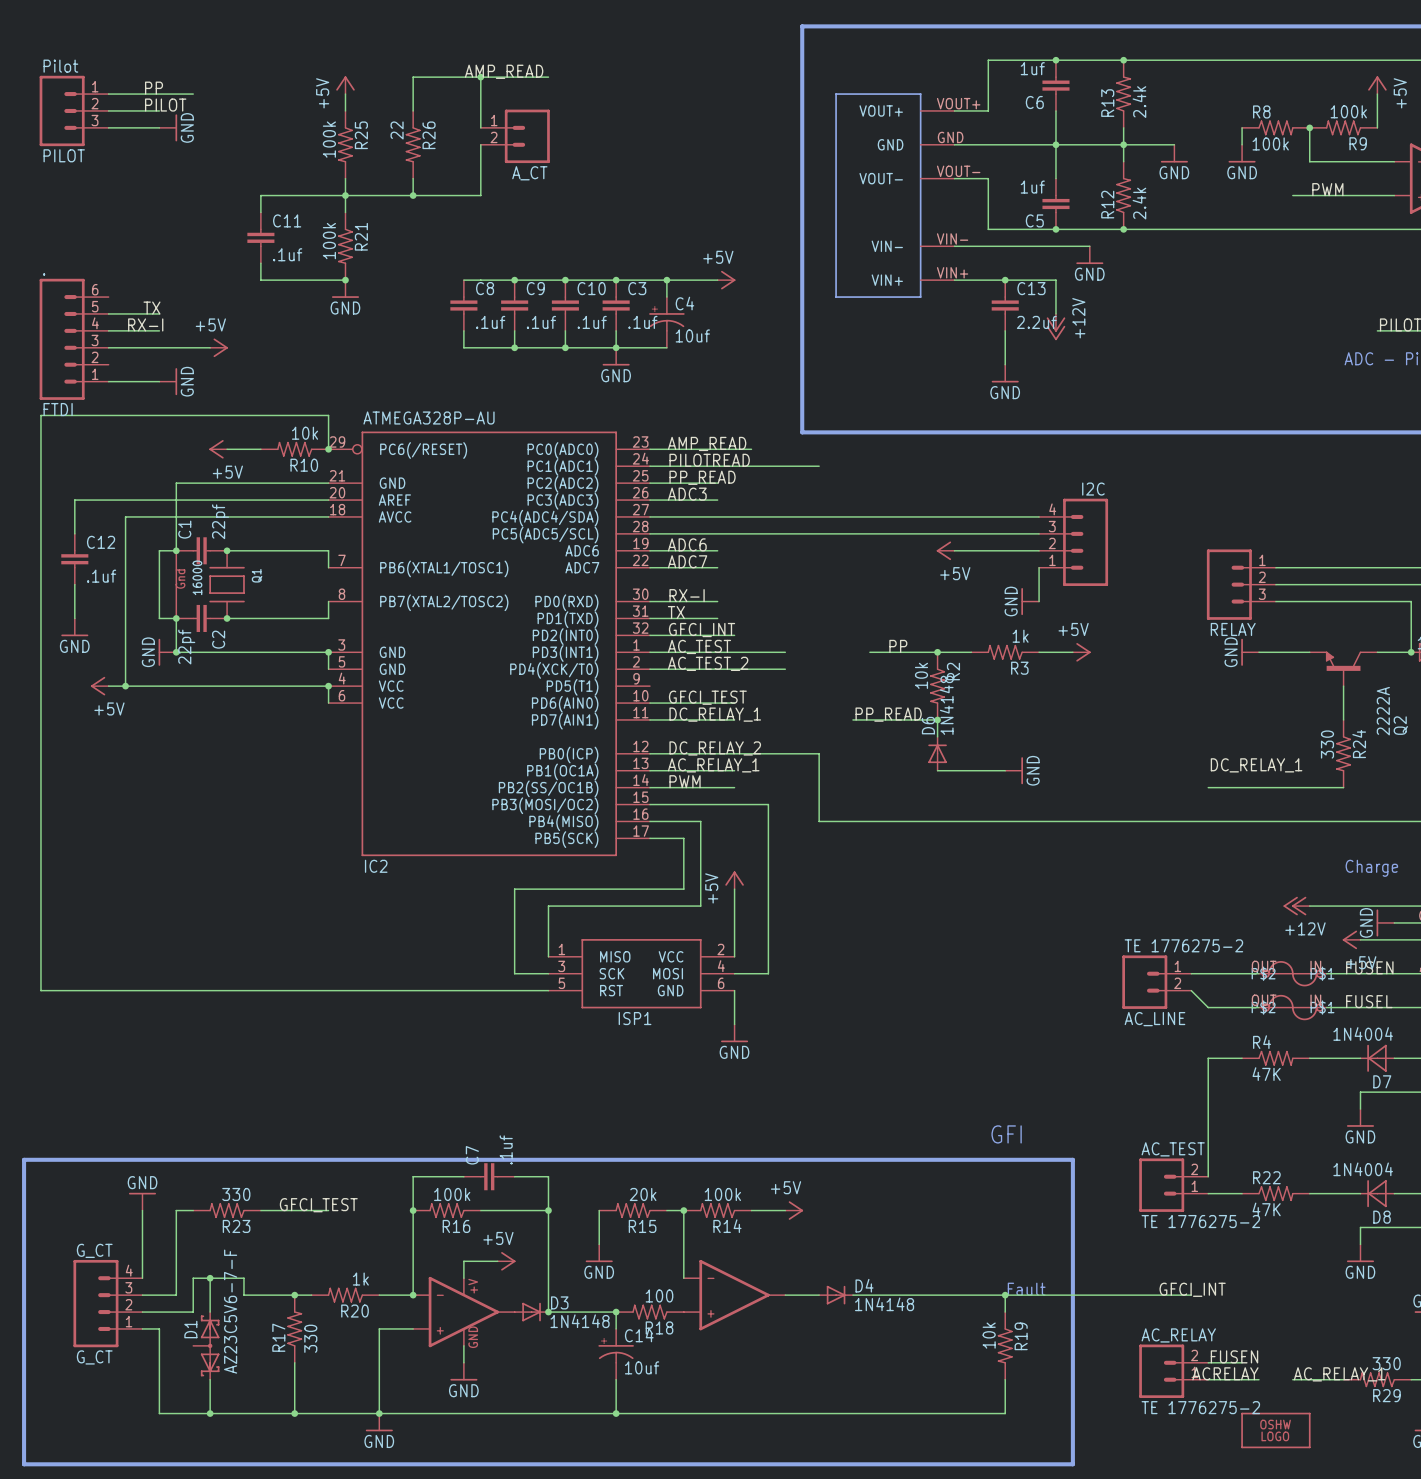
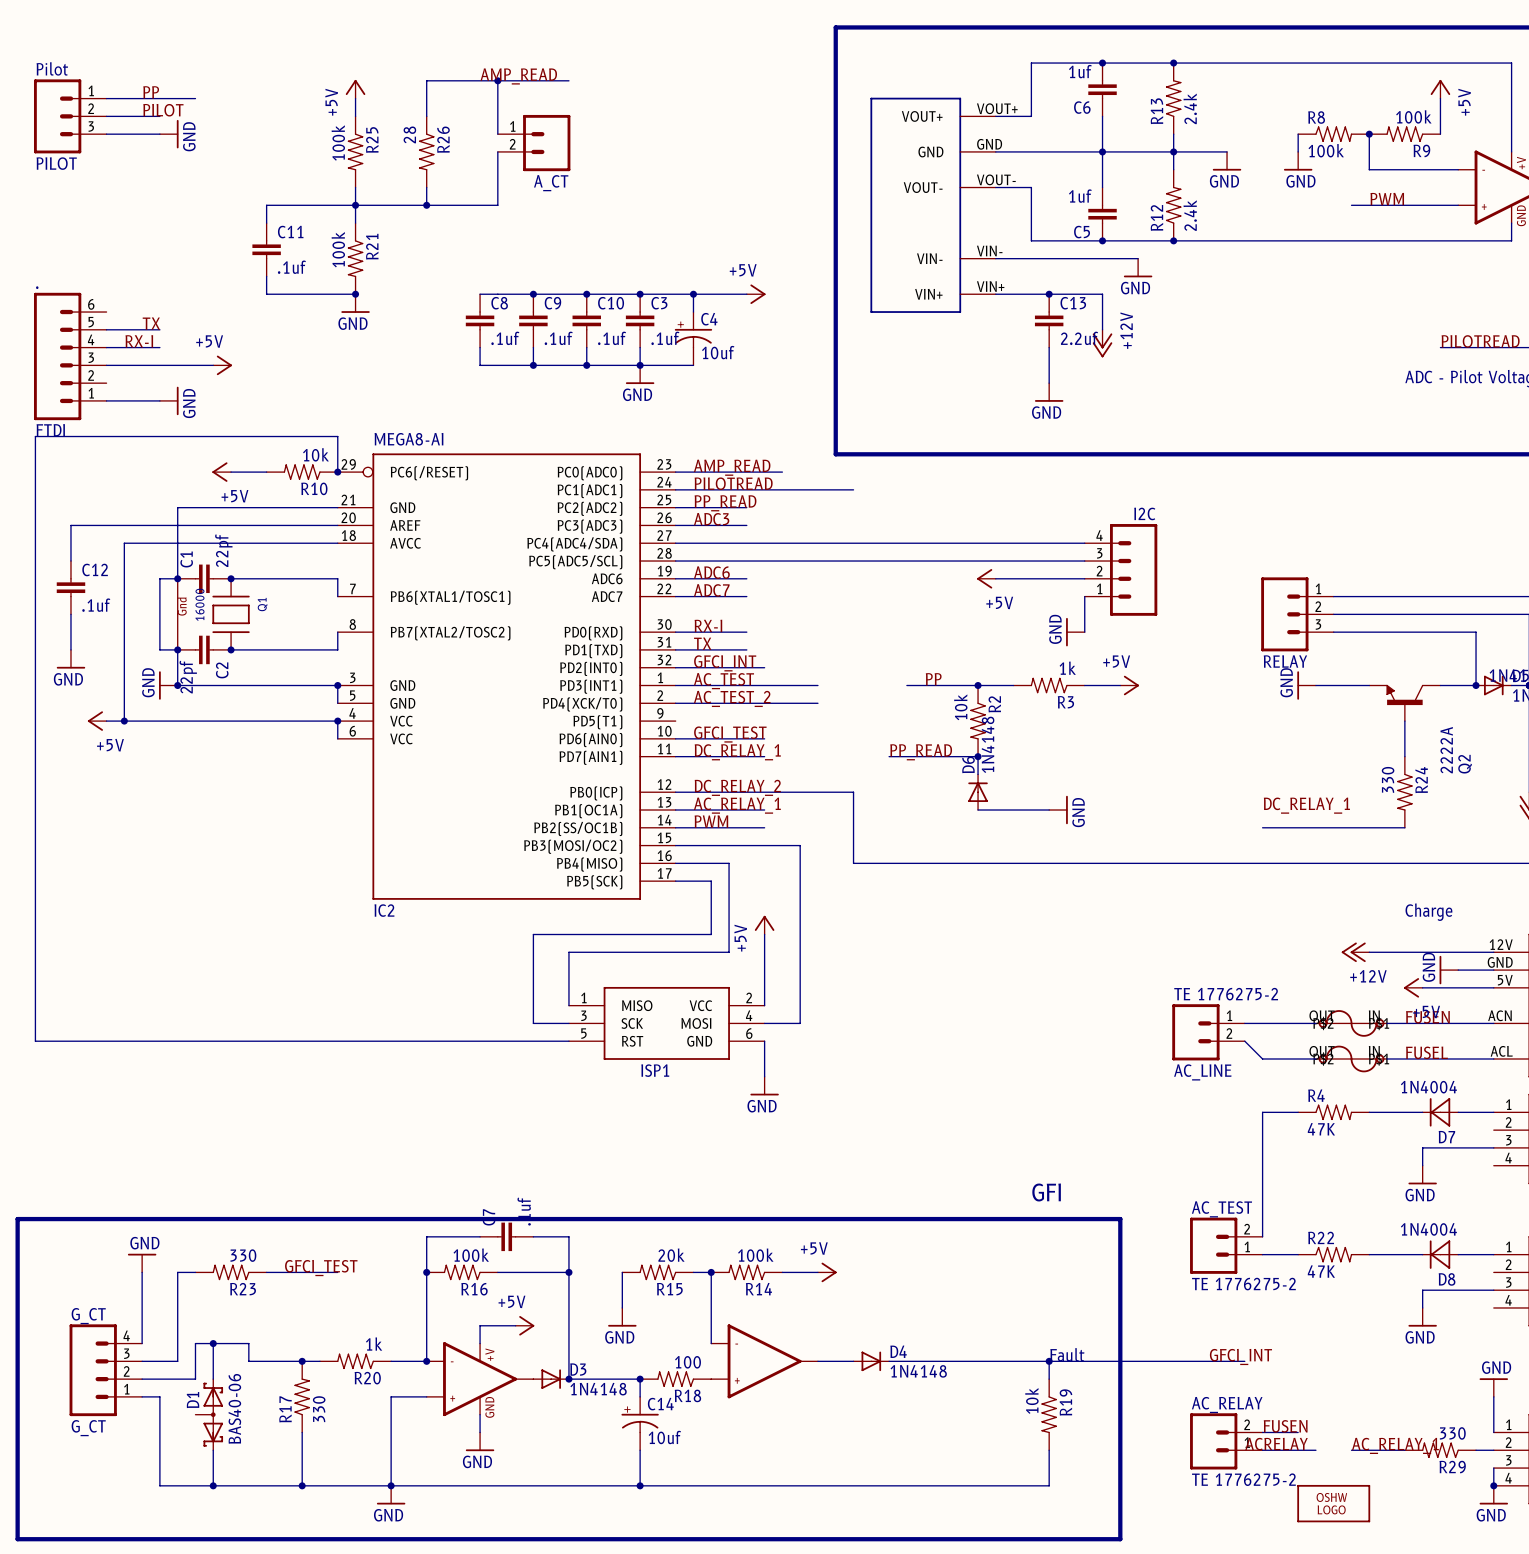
R26 value: 22 (397, 130) -> 28 (409, 134)
IC2 value: ATMEGA328P-AU (428, 418) -> MEGA8-AI (408, 439)
D1 value: AZ23C5V6-7-F (230, 1311) -> BAS40-06 (234, 1408)

